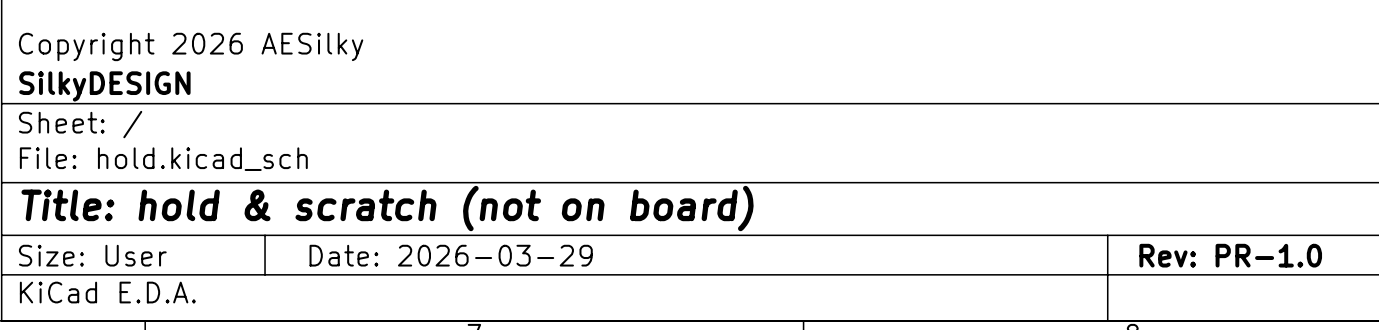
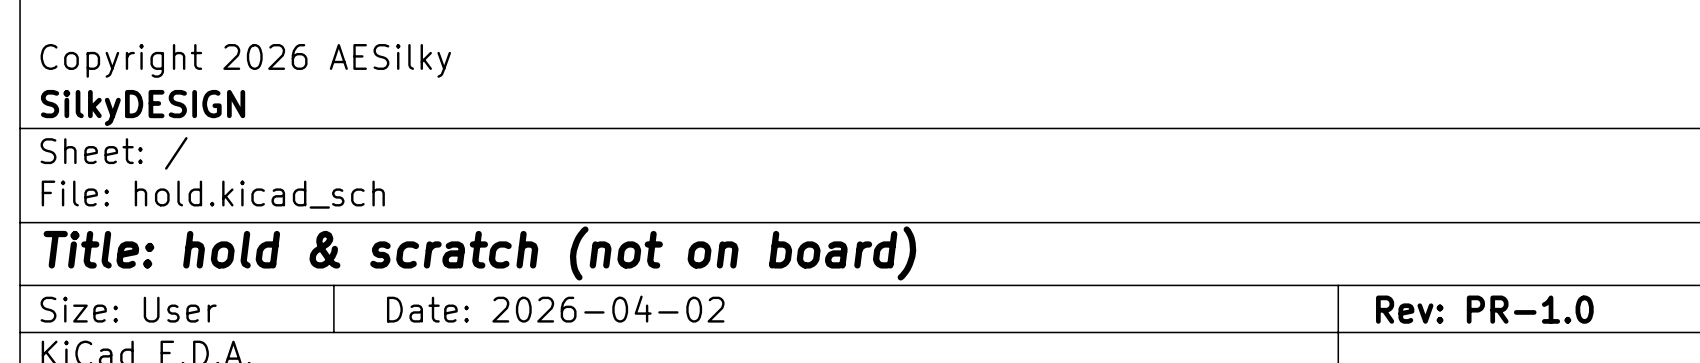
title block: Date: 2026-03-29 (451, 255) -> Date: 2026-04-02 (555, 309)

